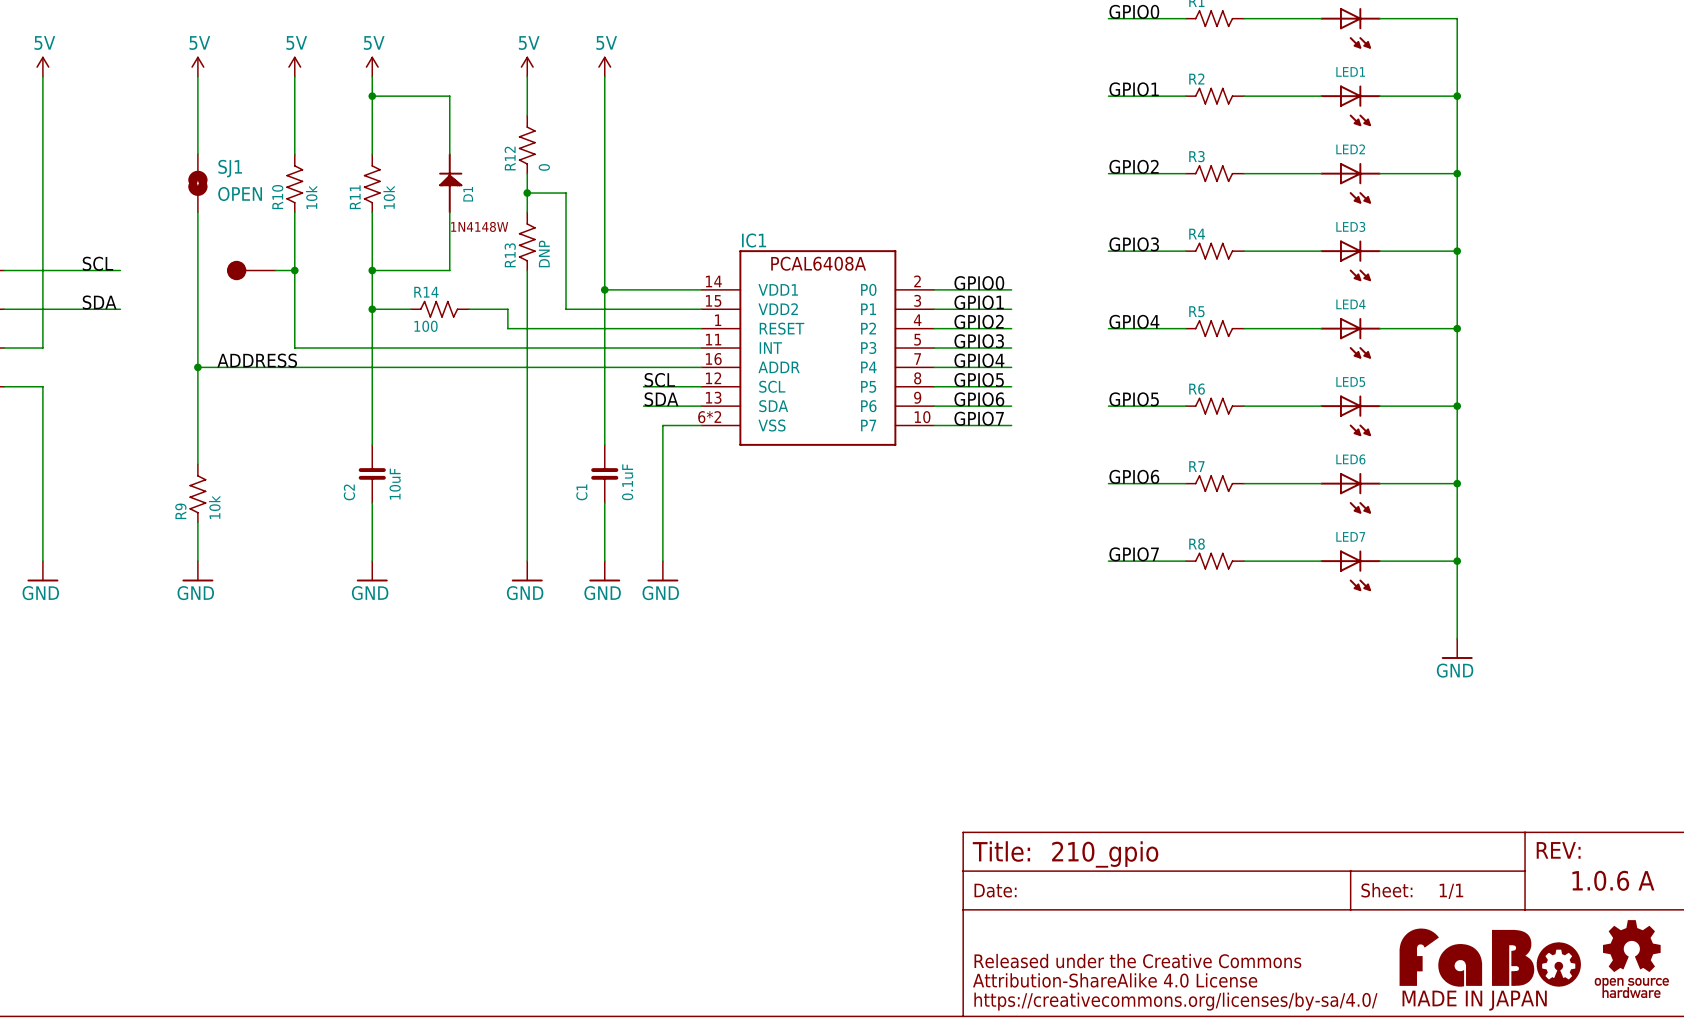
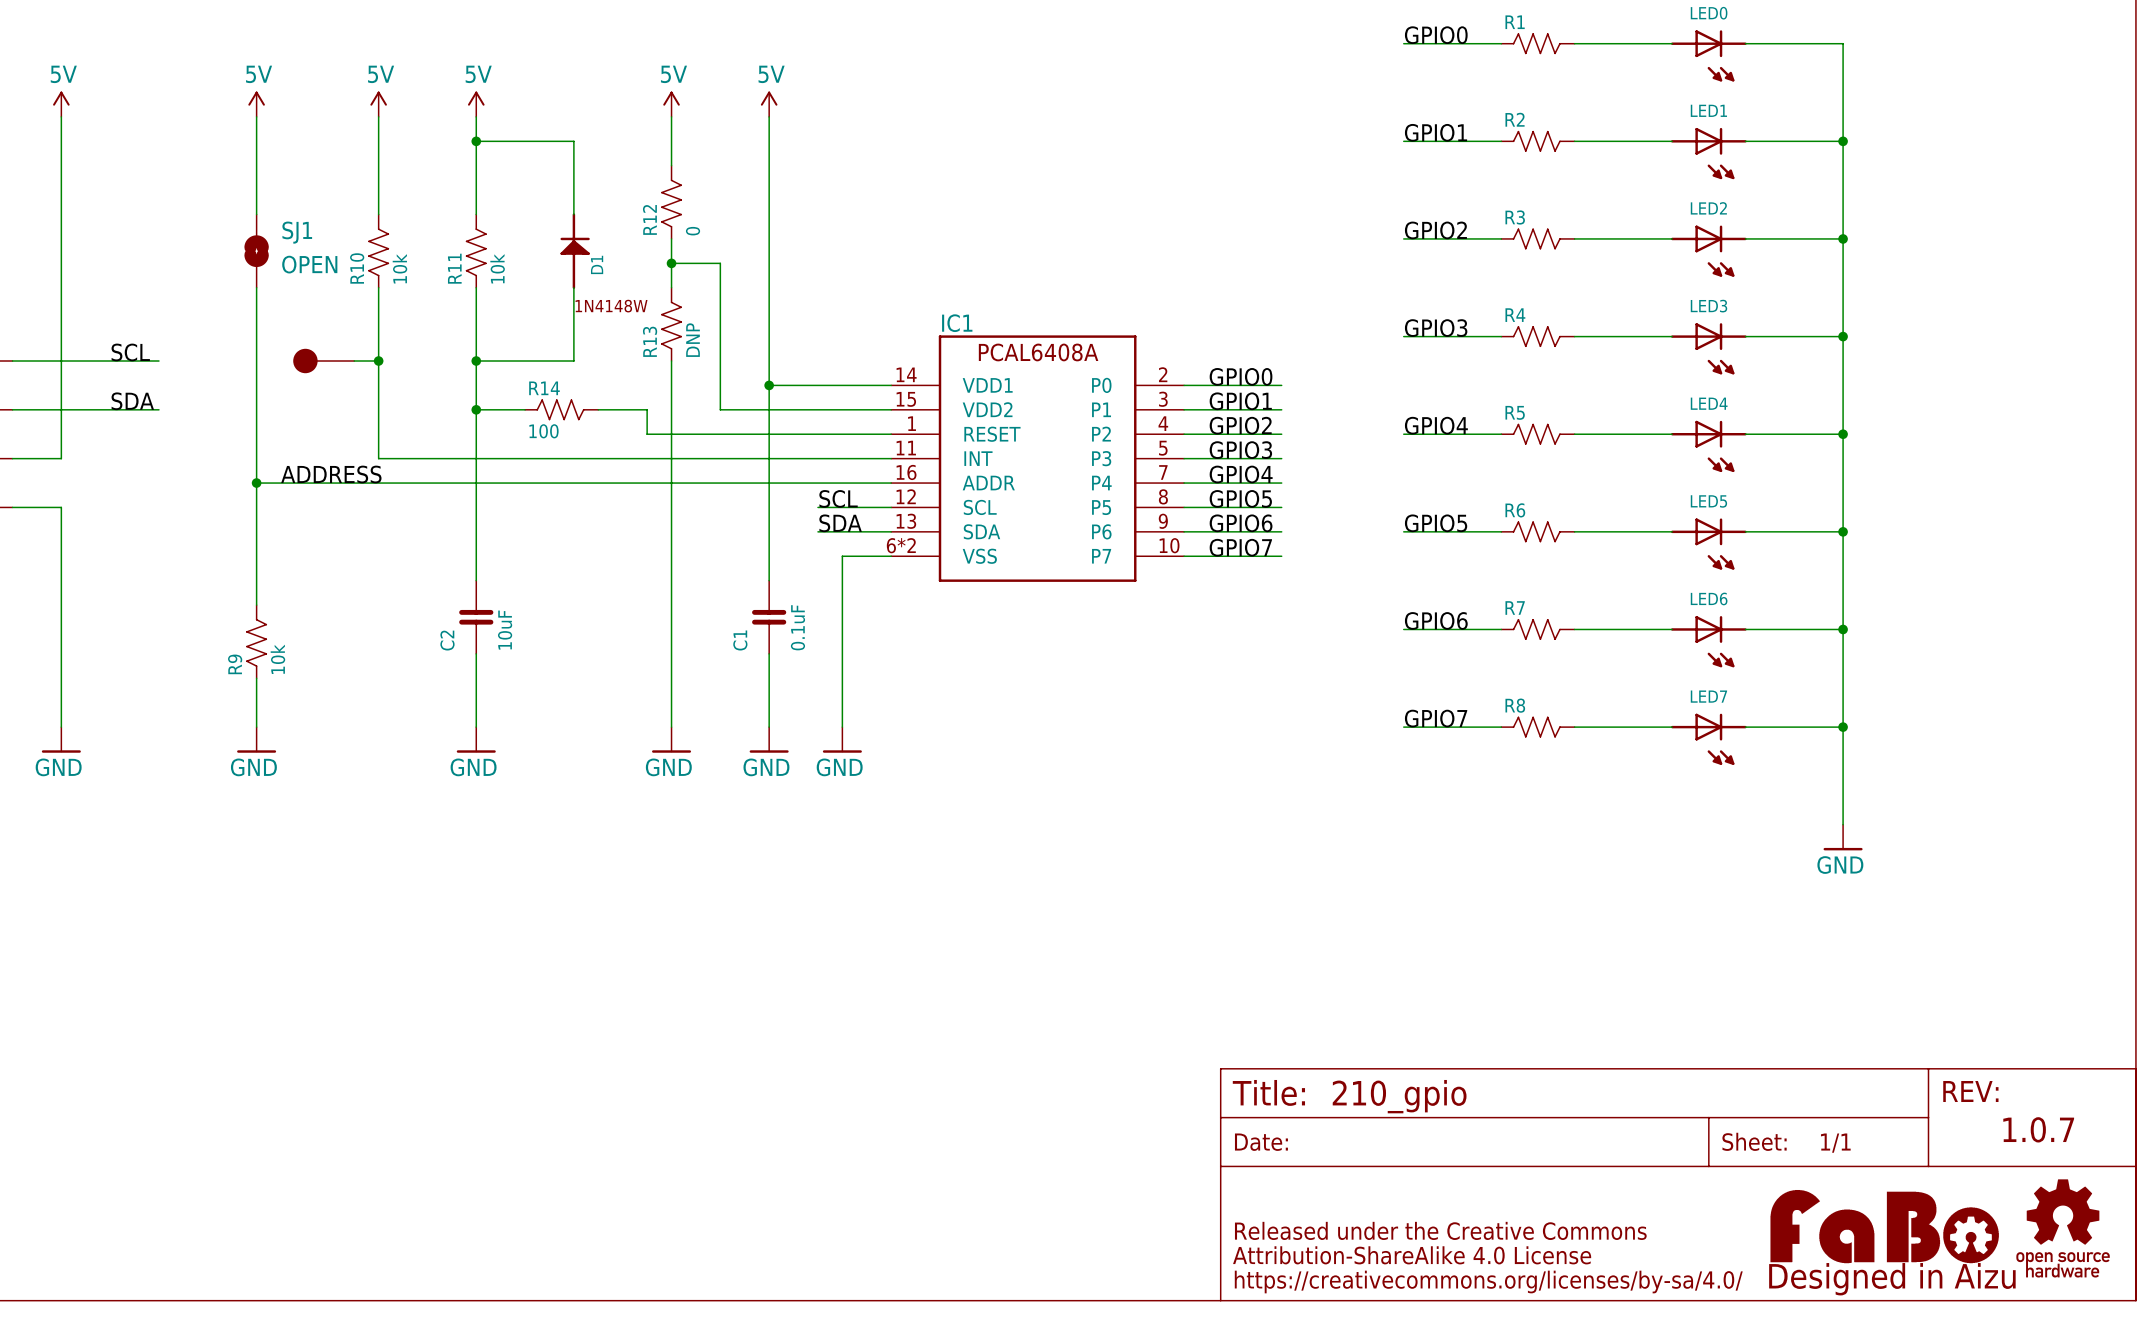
text: 1.0.6 A (1613, 880) -> 1.0.7 (2038, 1129)
part text: none -> Designed in Aizu (1892, 1279)
part text: MADE IN JAPAN (1474, 1000) -> none

